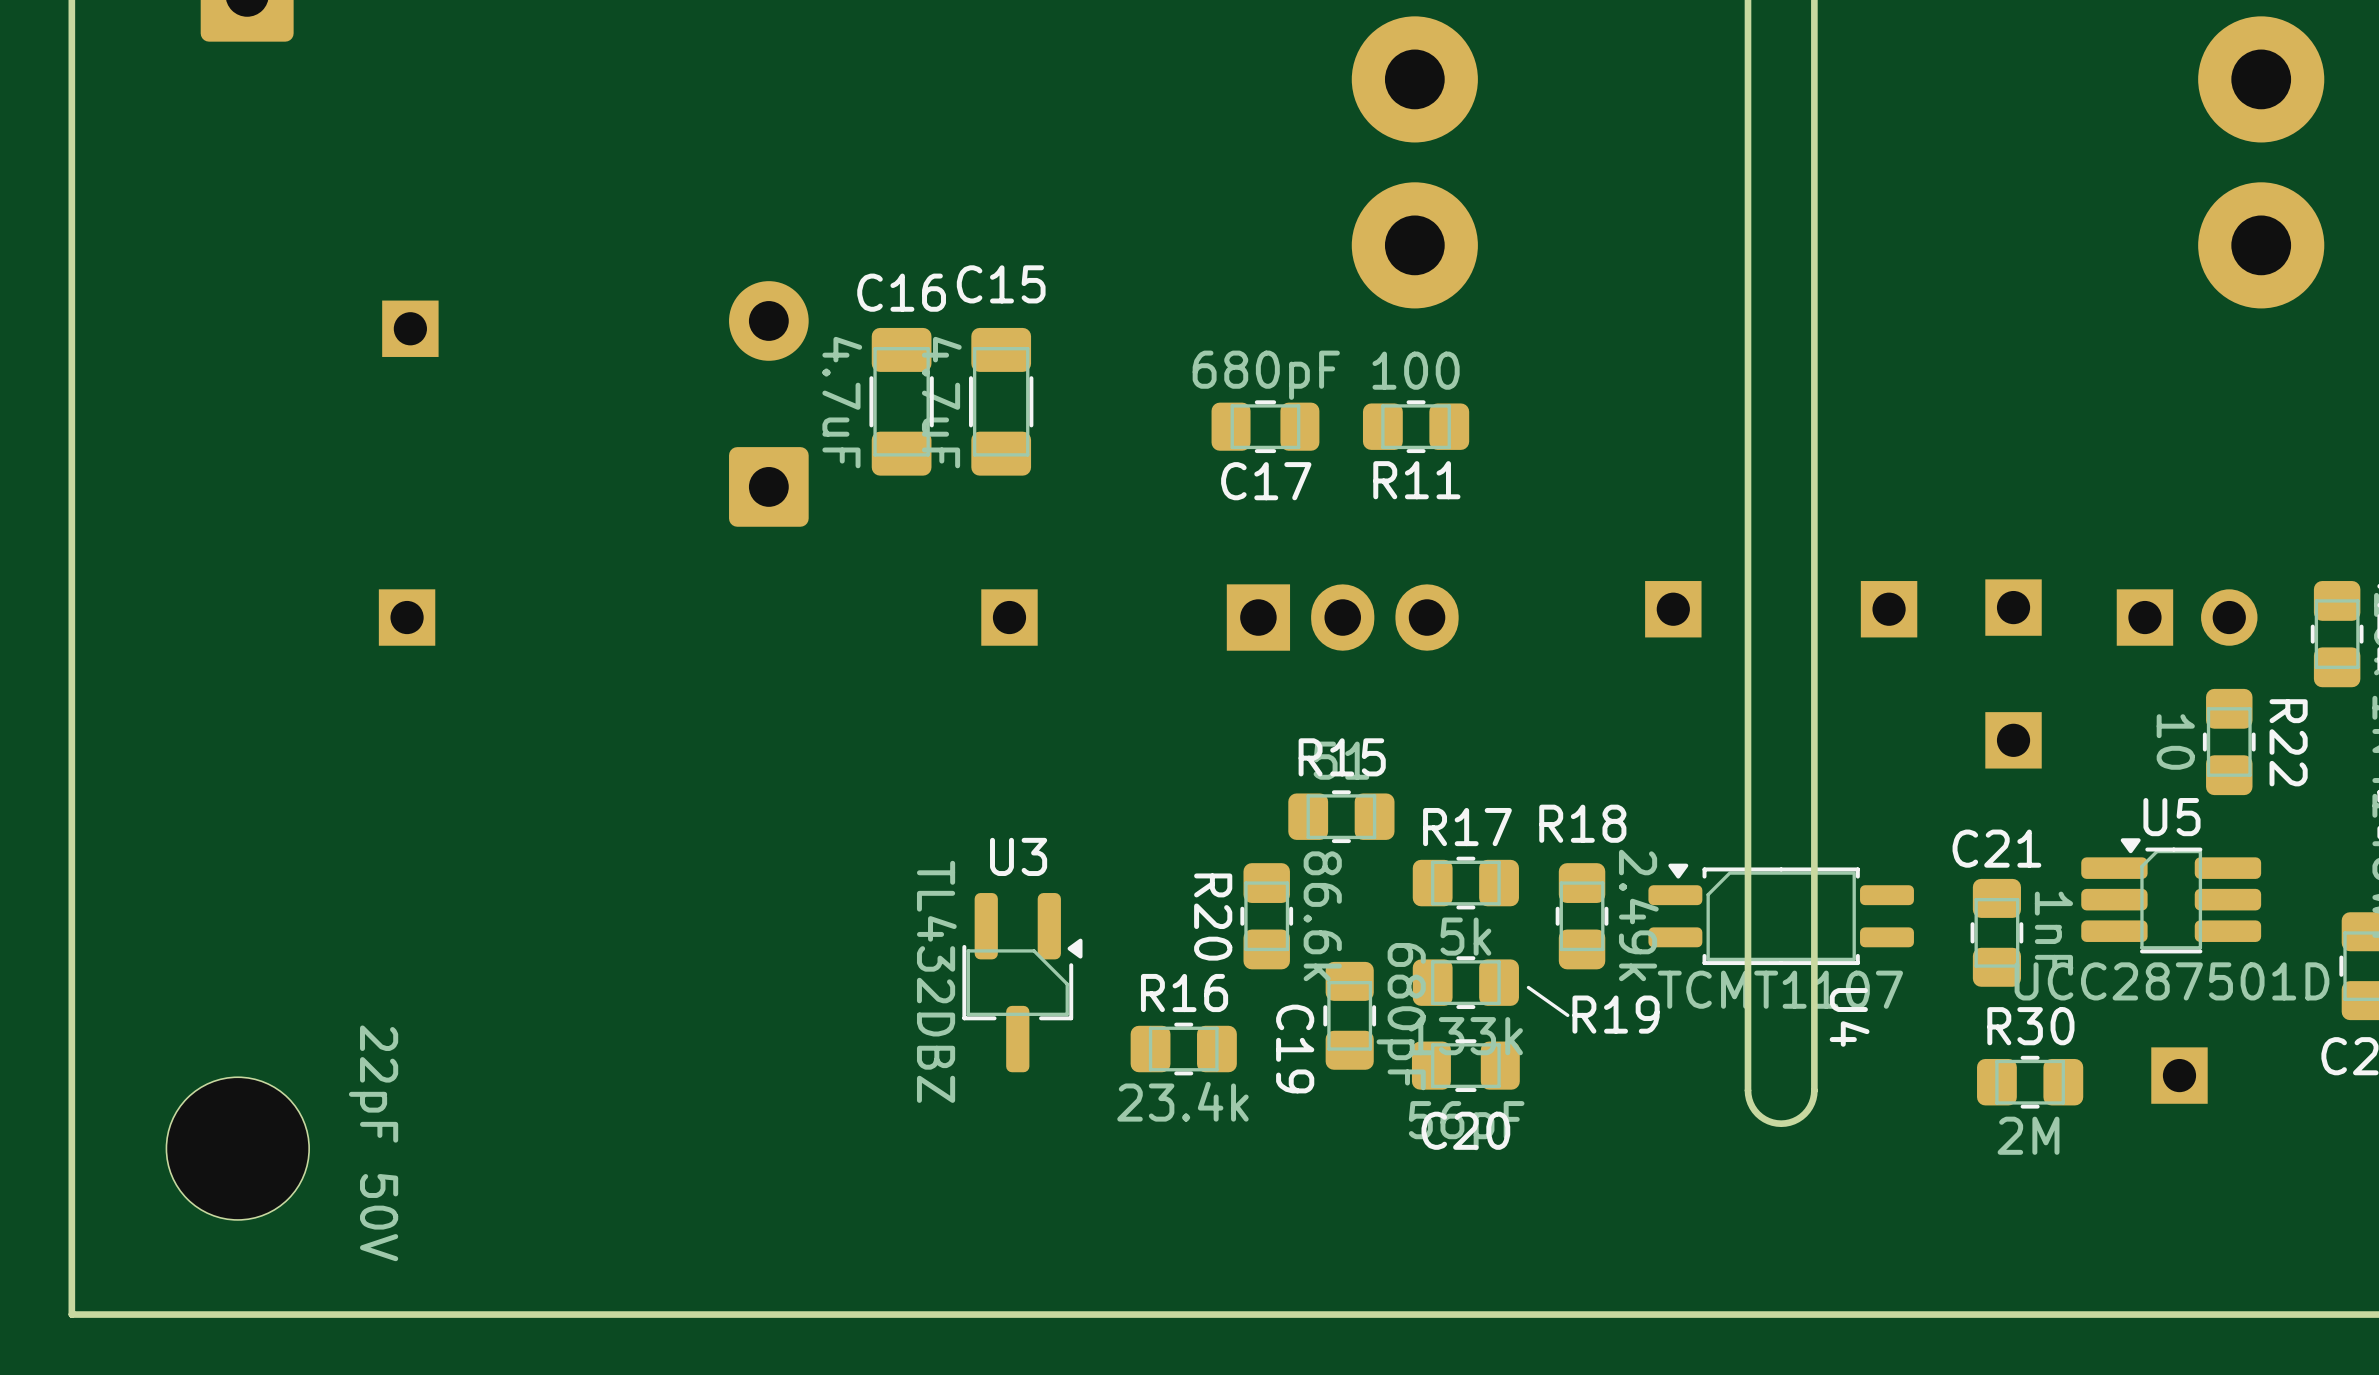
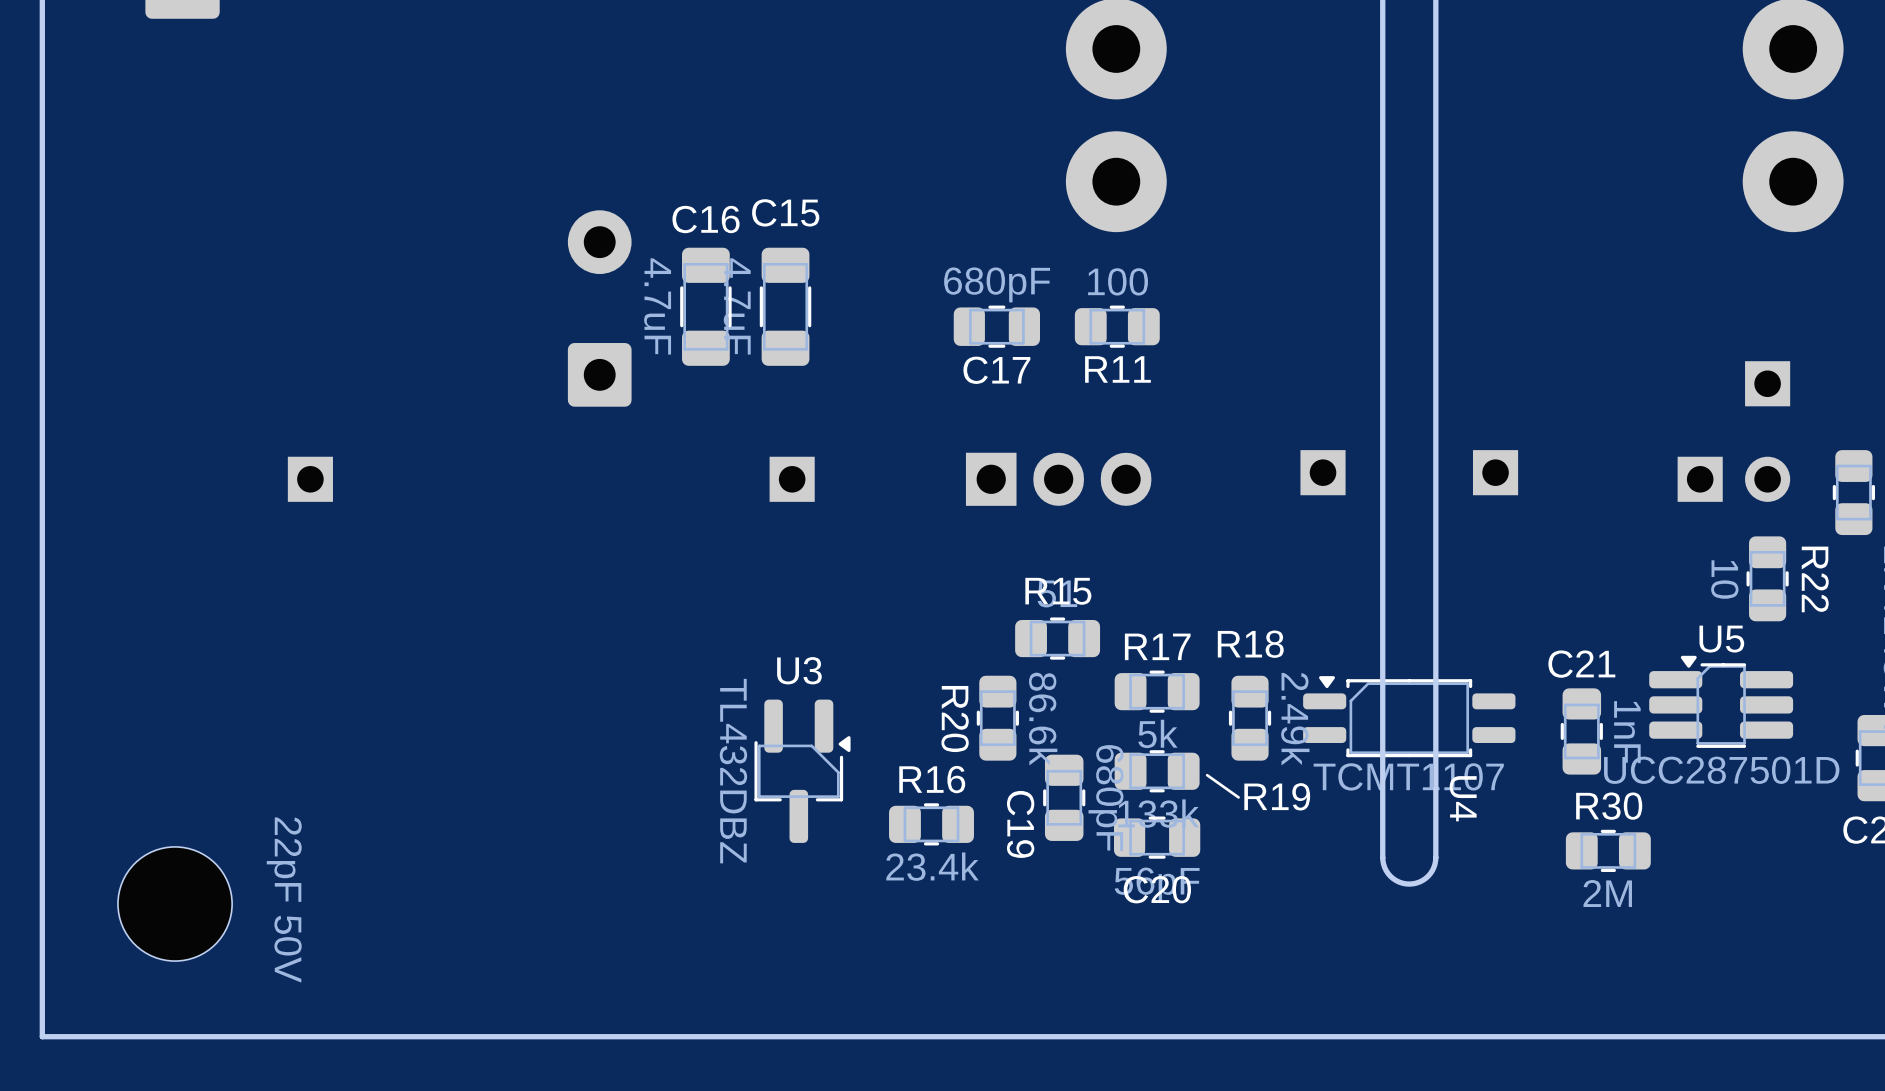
part: (410, 328) -> none
part: none -> (1767, 383)
part: (2013, 607) -> none
part: (2013, 740) -> none
part: (2179, 1075) -> none

